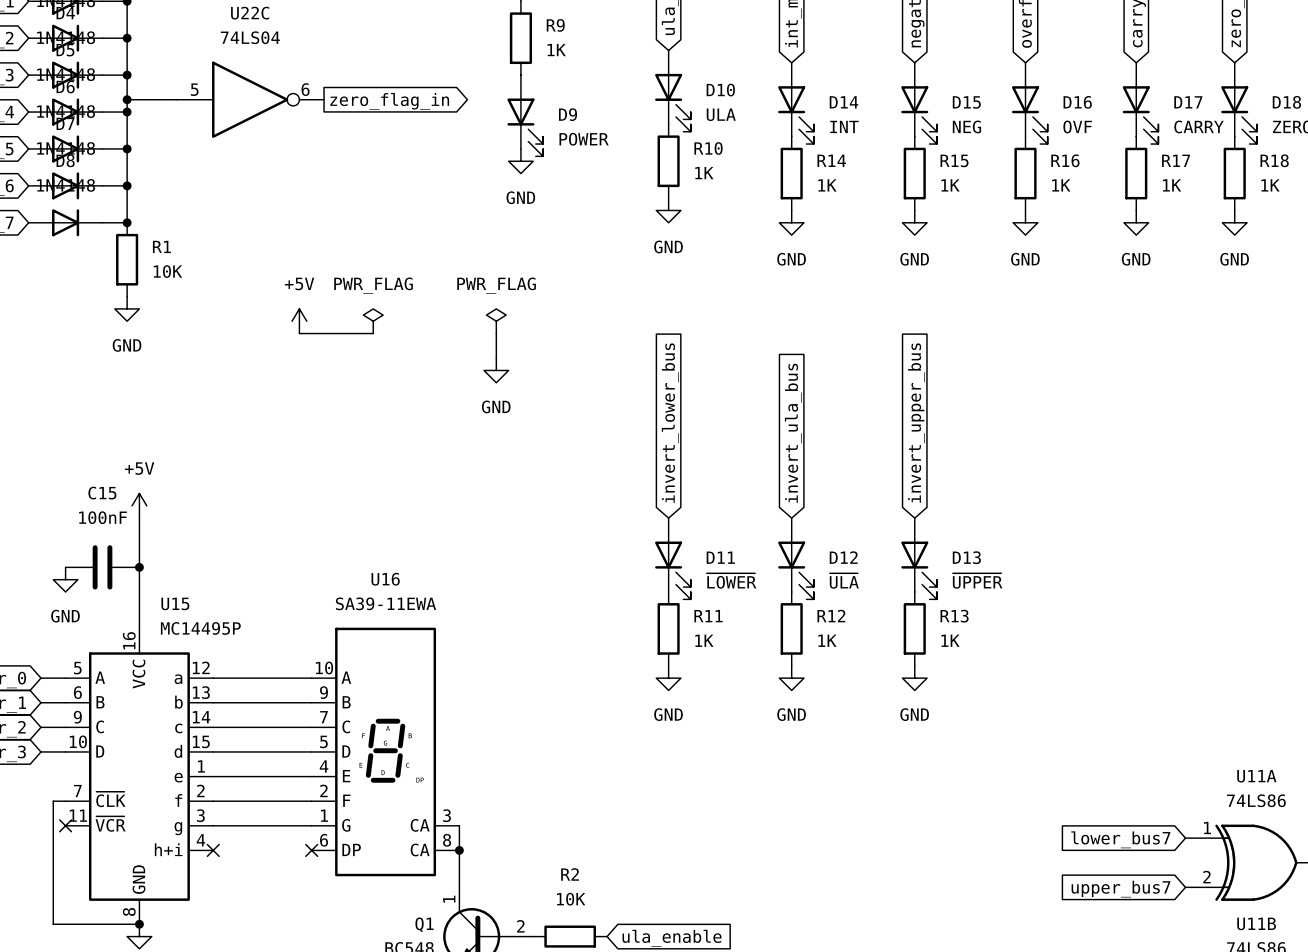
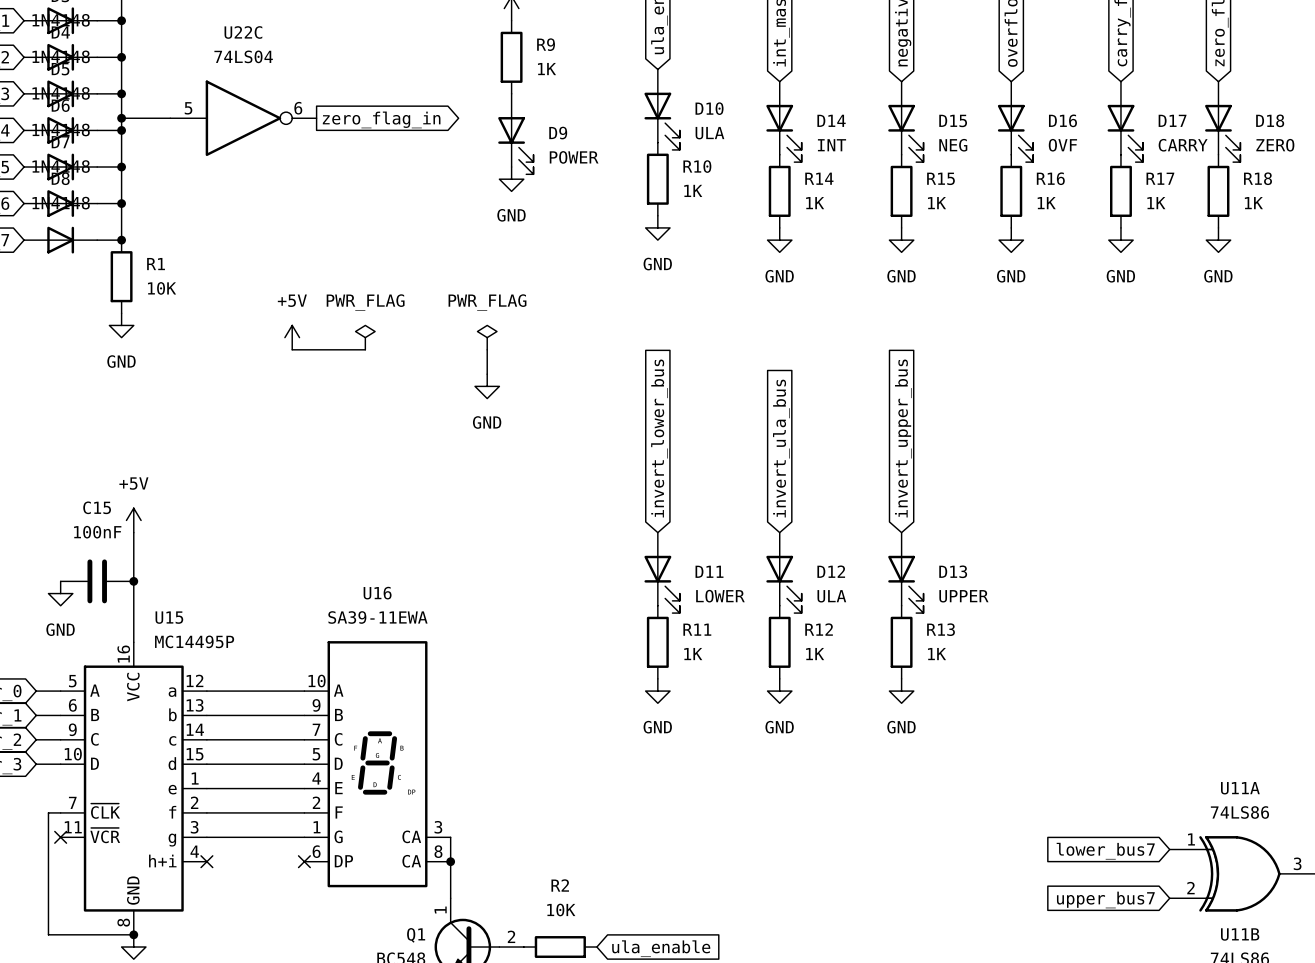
D11 value: ~{LOWER} (731, 581) -> LOWER (720, 596)
D12 value: ~{ULA} (844, 581) -> ULA (831, 596)
D13 value: ~{UPPER} (977, 581) -> UPPER (963, 596)

